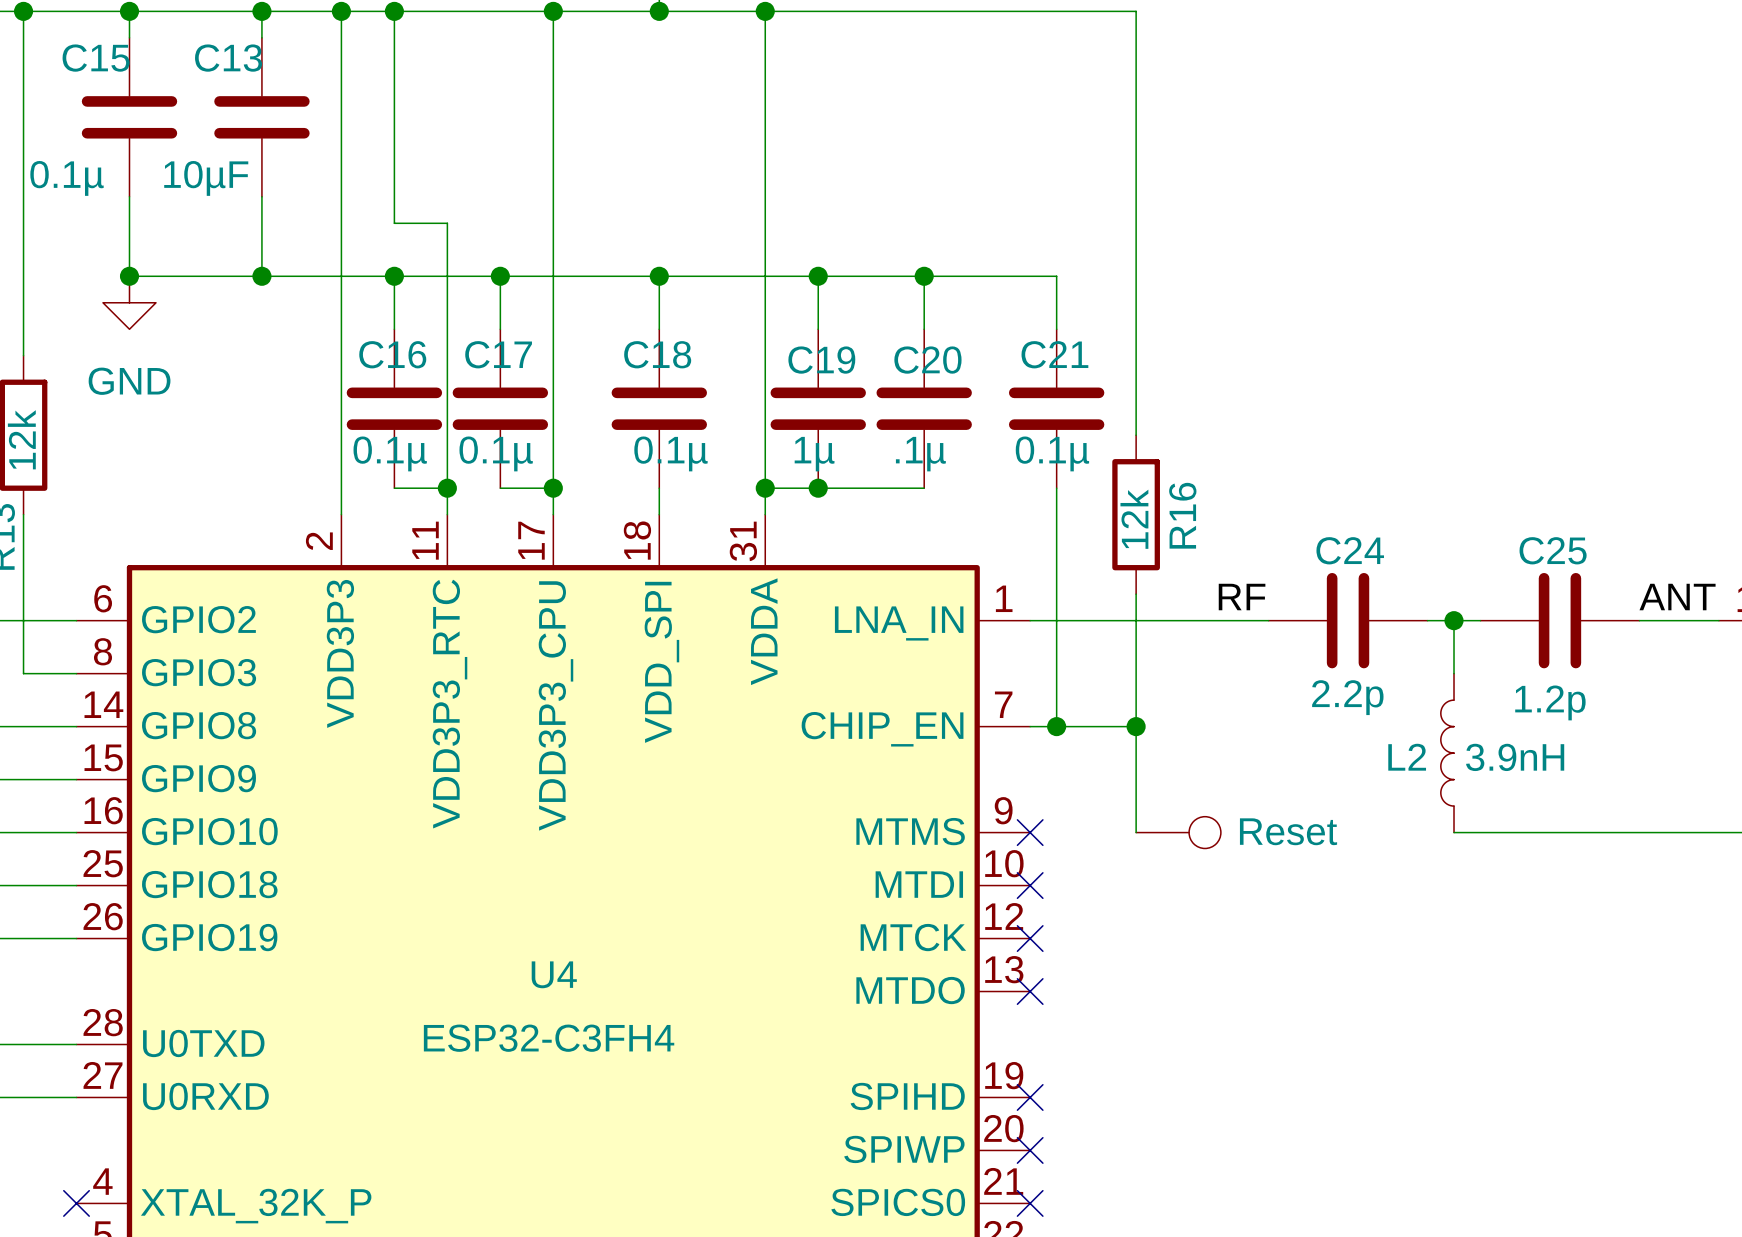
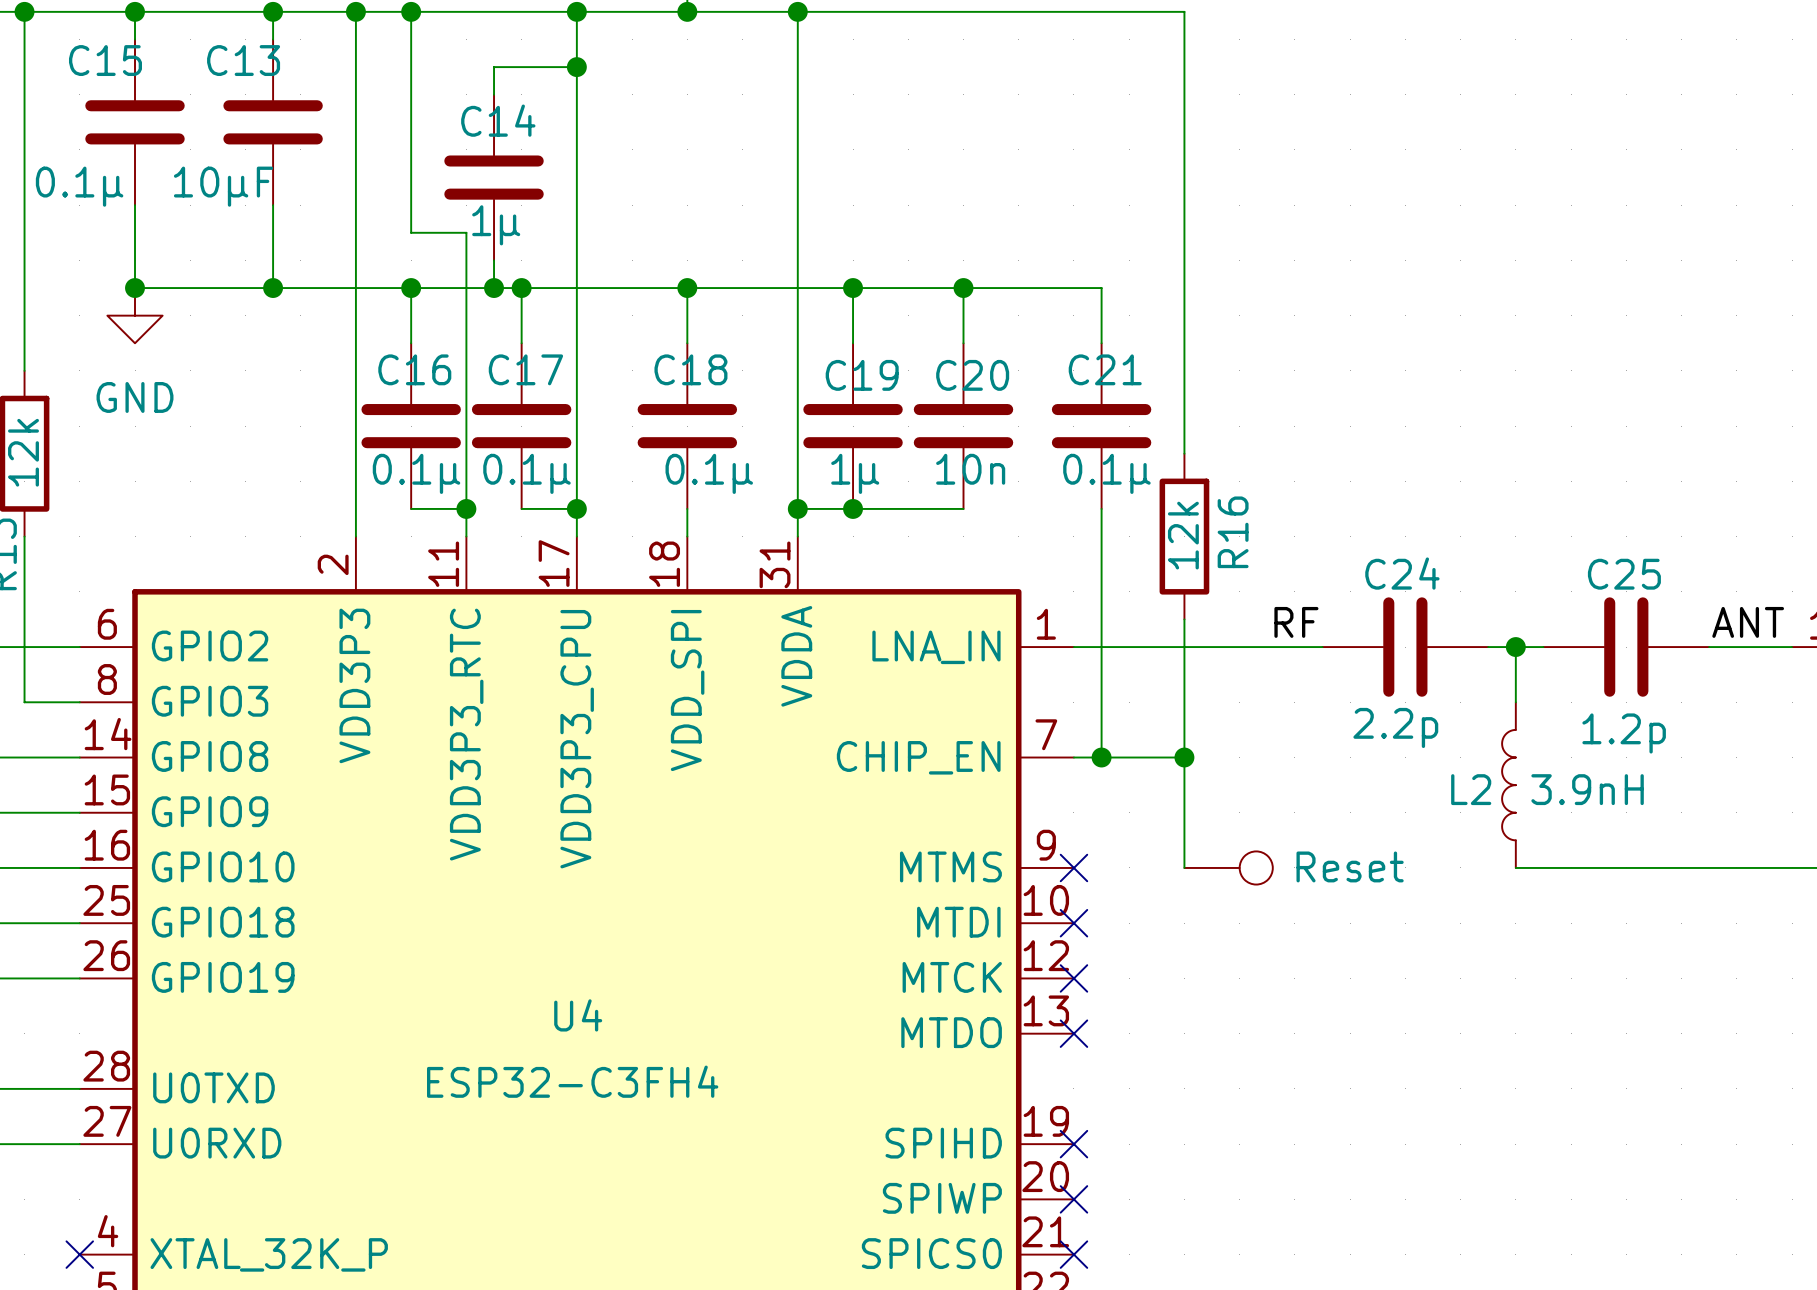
wire: none -> (576, 67) (494, 67) (494, 94)
junction: none -> (576, 67)
C14: none -> 1µ (494, 177)
wire: none -> (494, 260) (494, 288)
junction: none -> (494, 288)
C20 value: .1µ (920, 454) -> 10n (970, 469)

